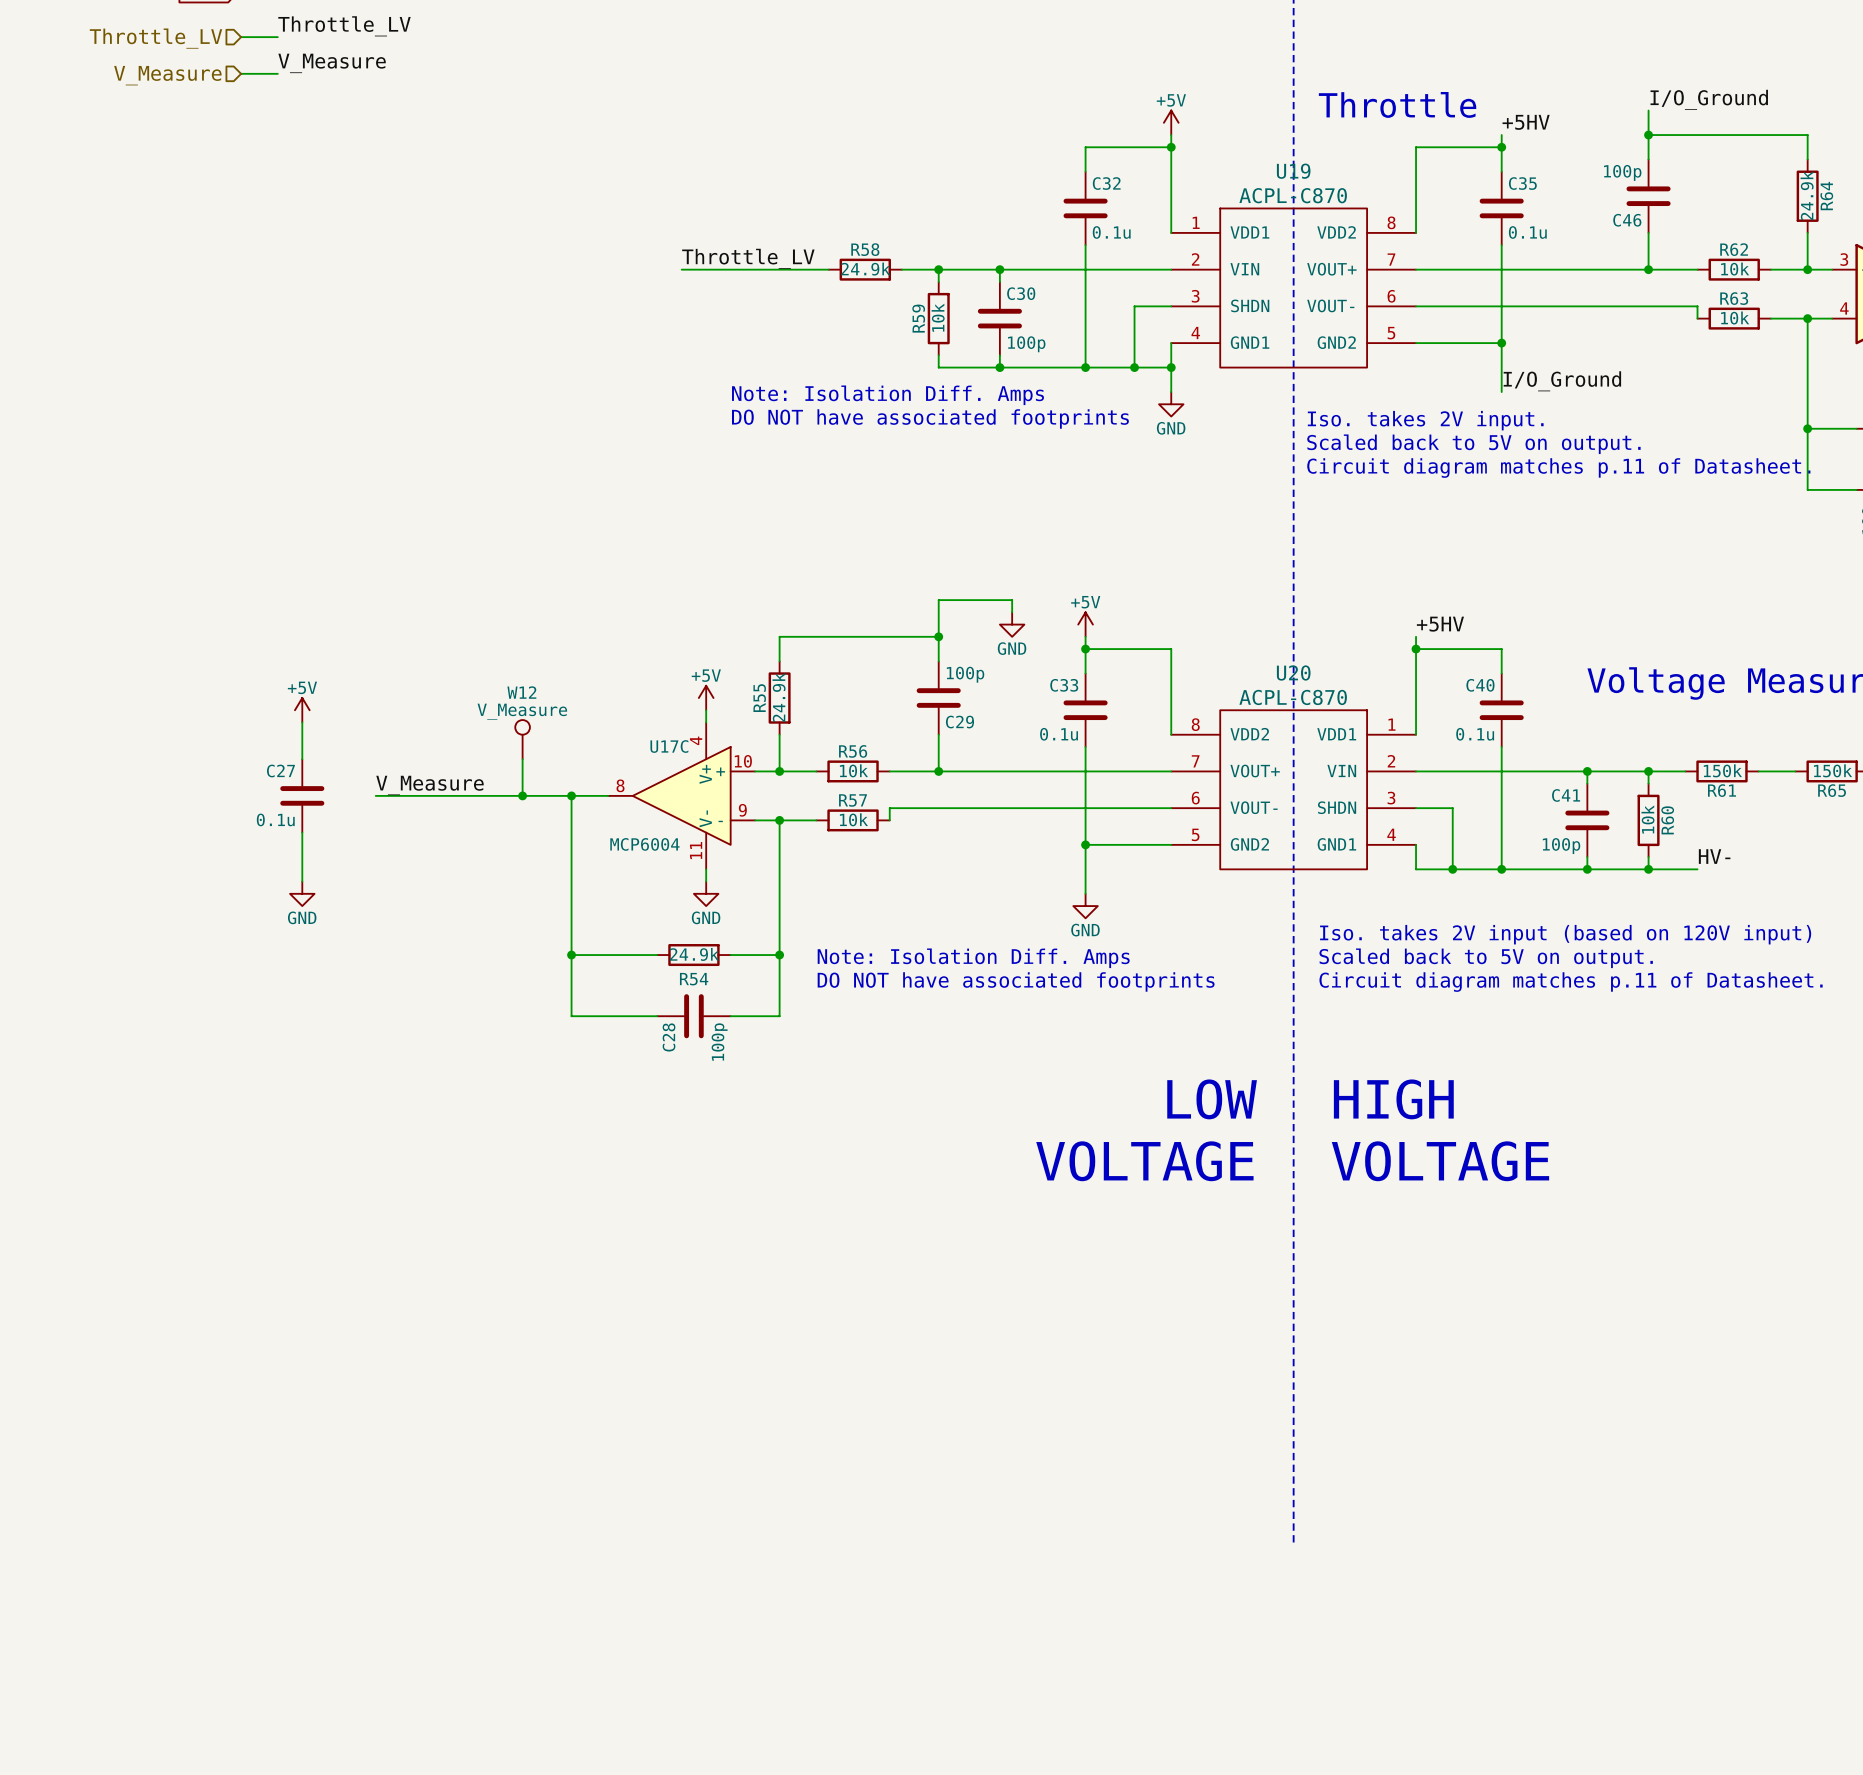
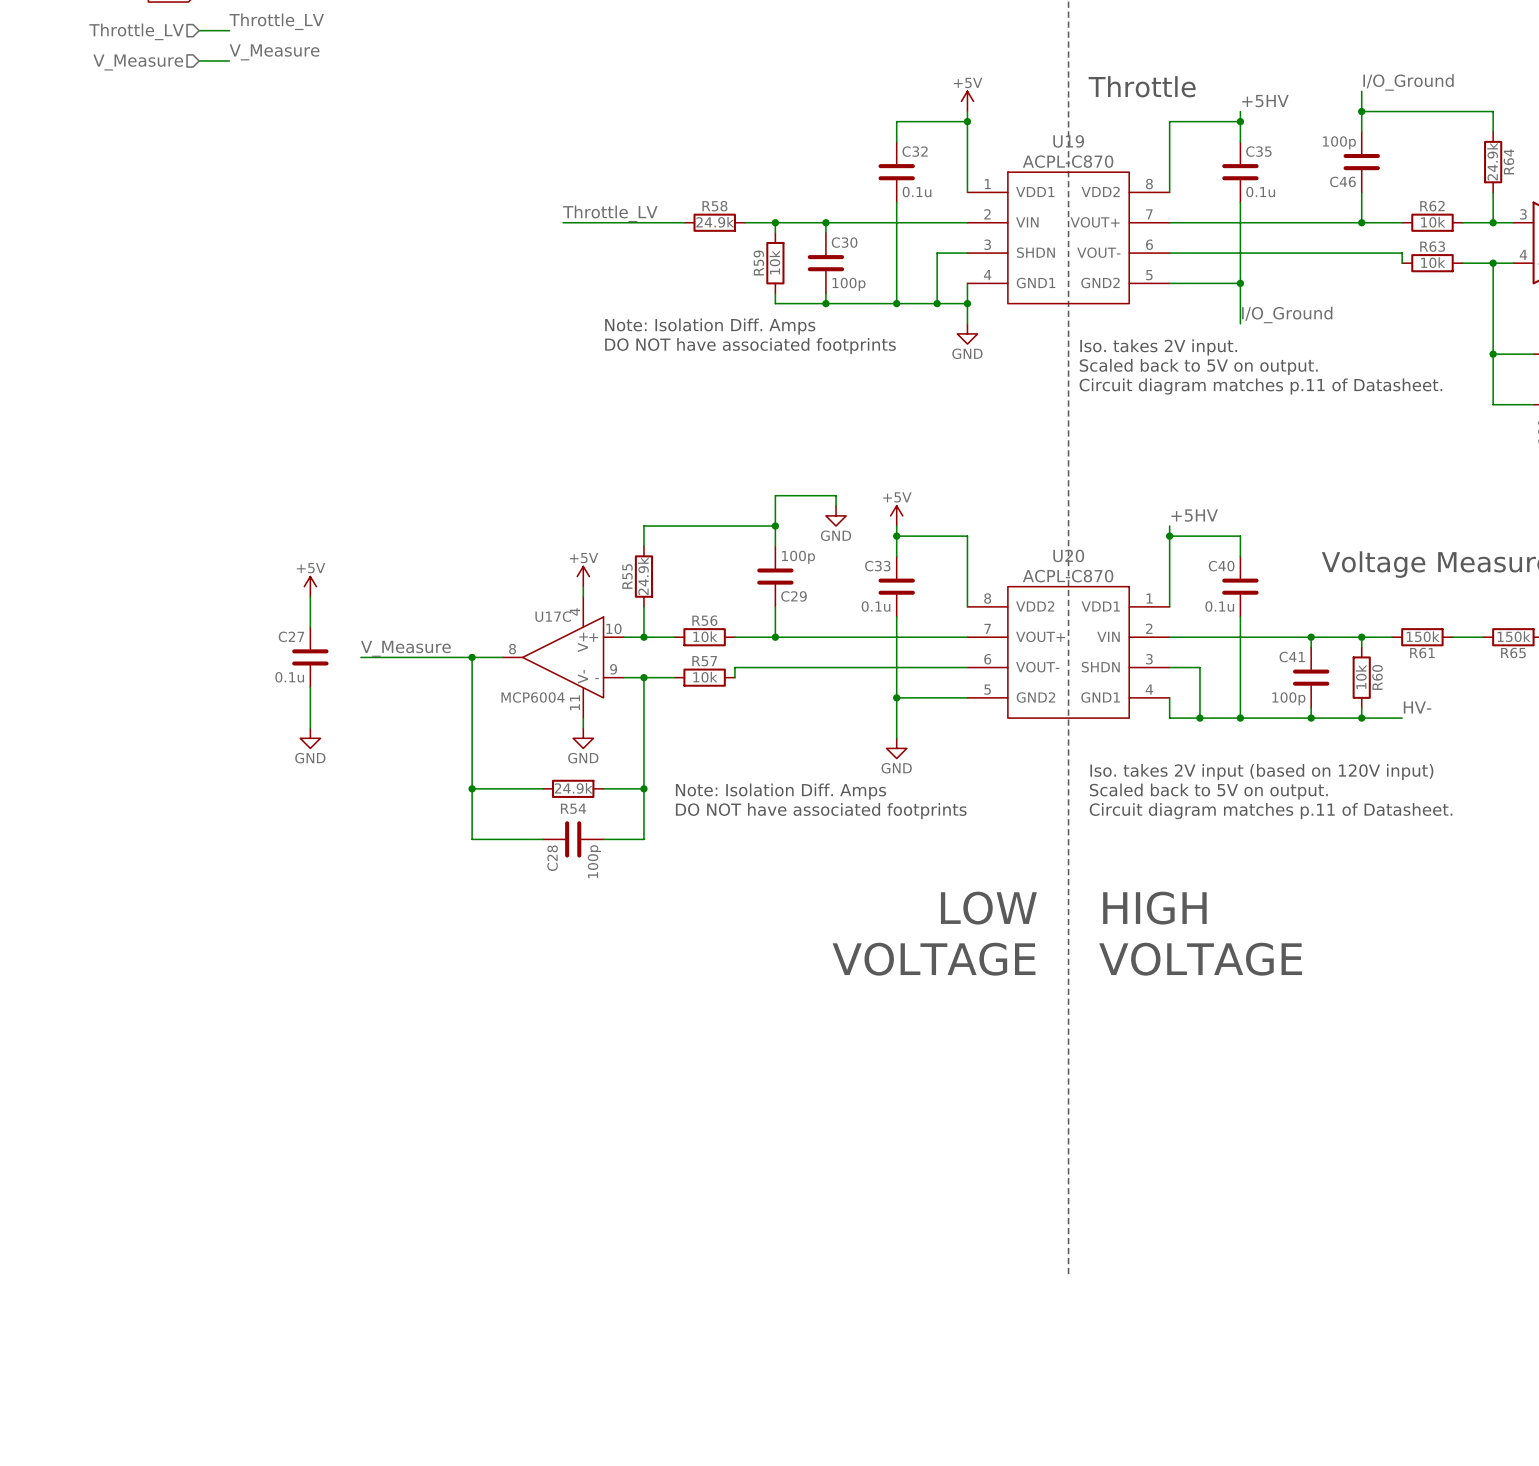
power symbol position: +5V (302, 710) -> +5V (310, 586)
wire: (302, 722) (302, 759) -> (310, 596) (310, 627)
W12: V_Measure (522, 739) -> none
wire: (522, 759) (522, 795) -> none
label position: V_Measure (429, 785) -> V_Measure (405, 648)
C27 position: (302, 795) -> (310, 657)
wire: (375, 795) (436, 795) -> none
junction: (522, 795) -> none
wire: (302, 832) (302, 881) -> (310, 687) (310, 728)
power symbol position: GND (302, 893) -> GND (310, 738)

